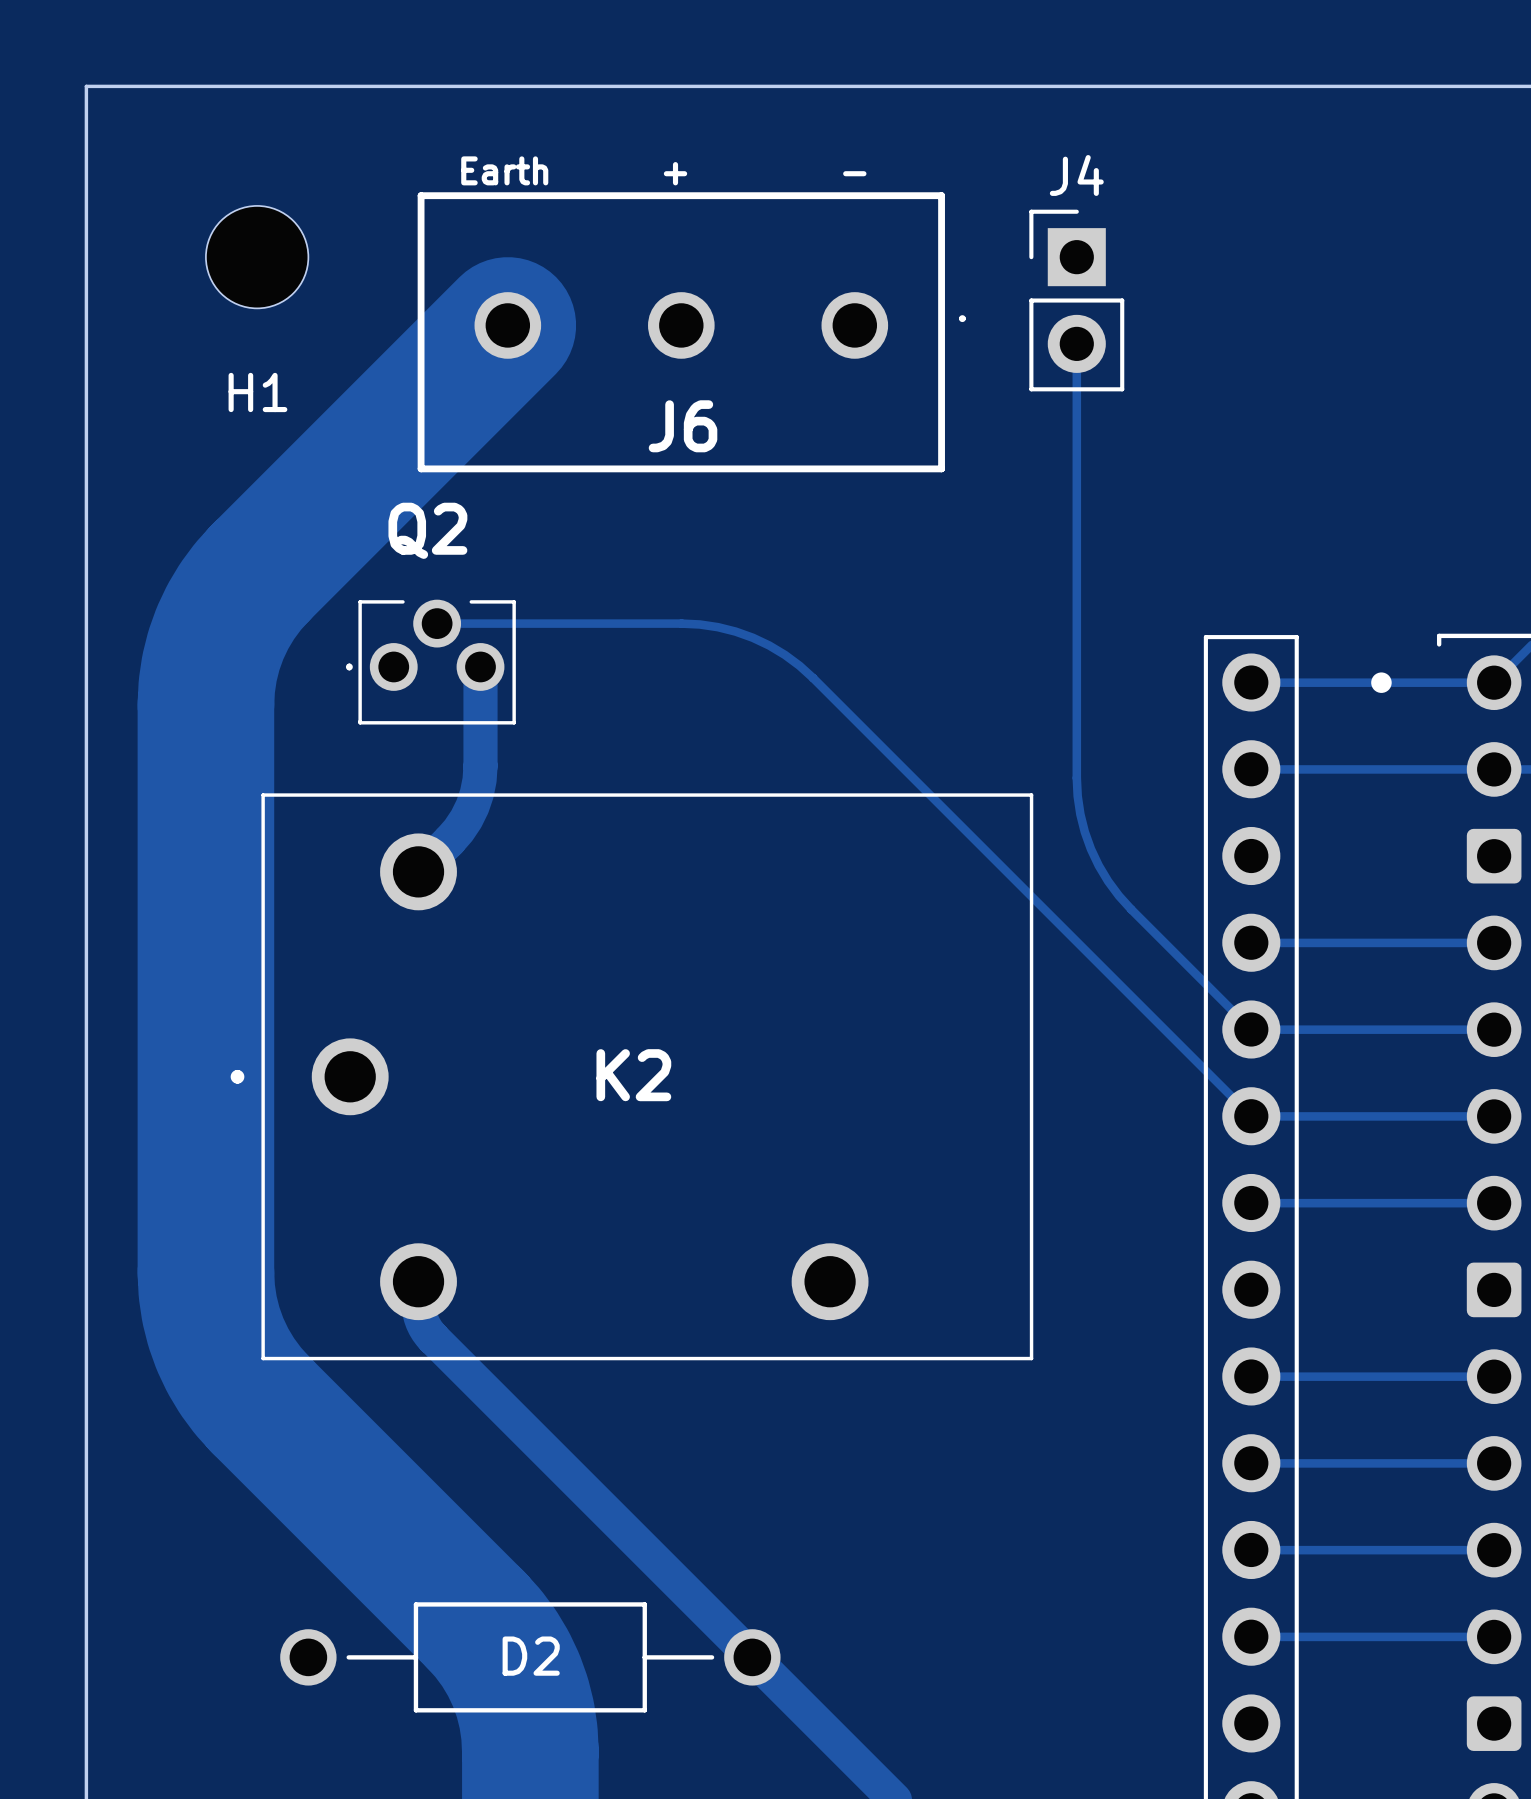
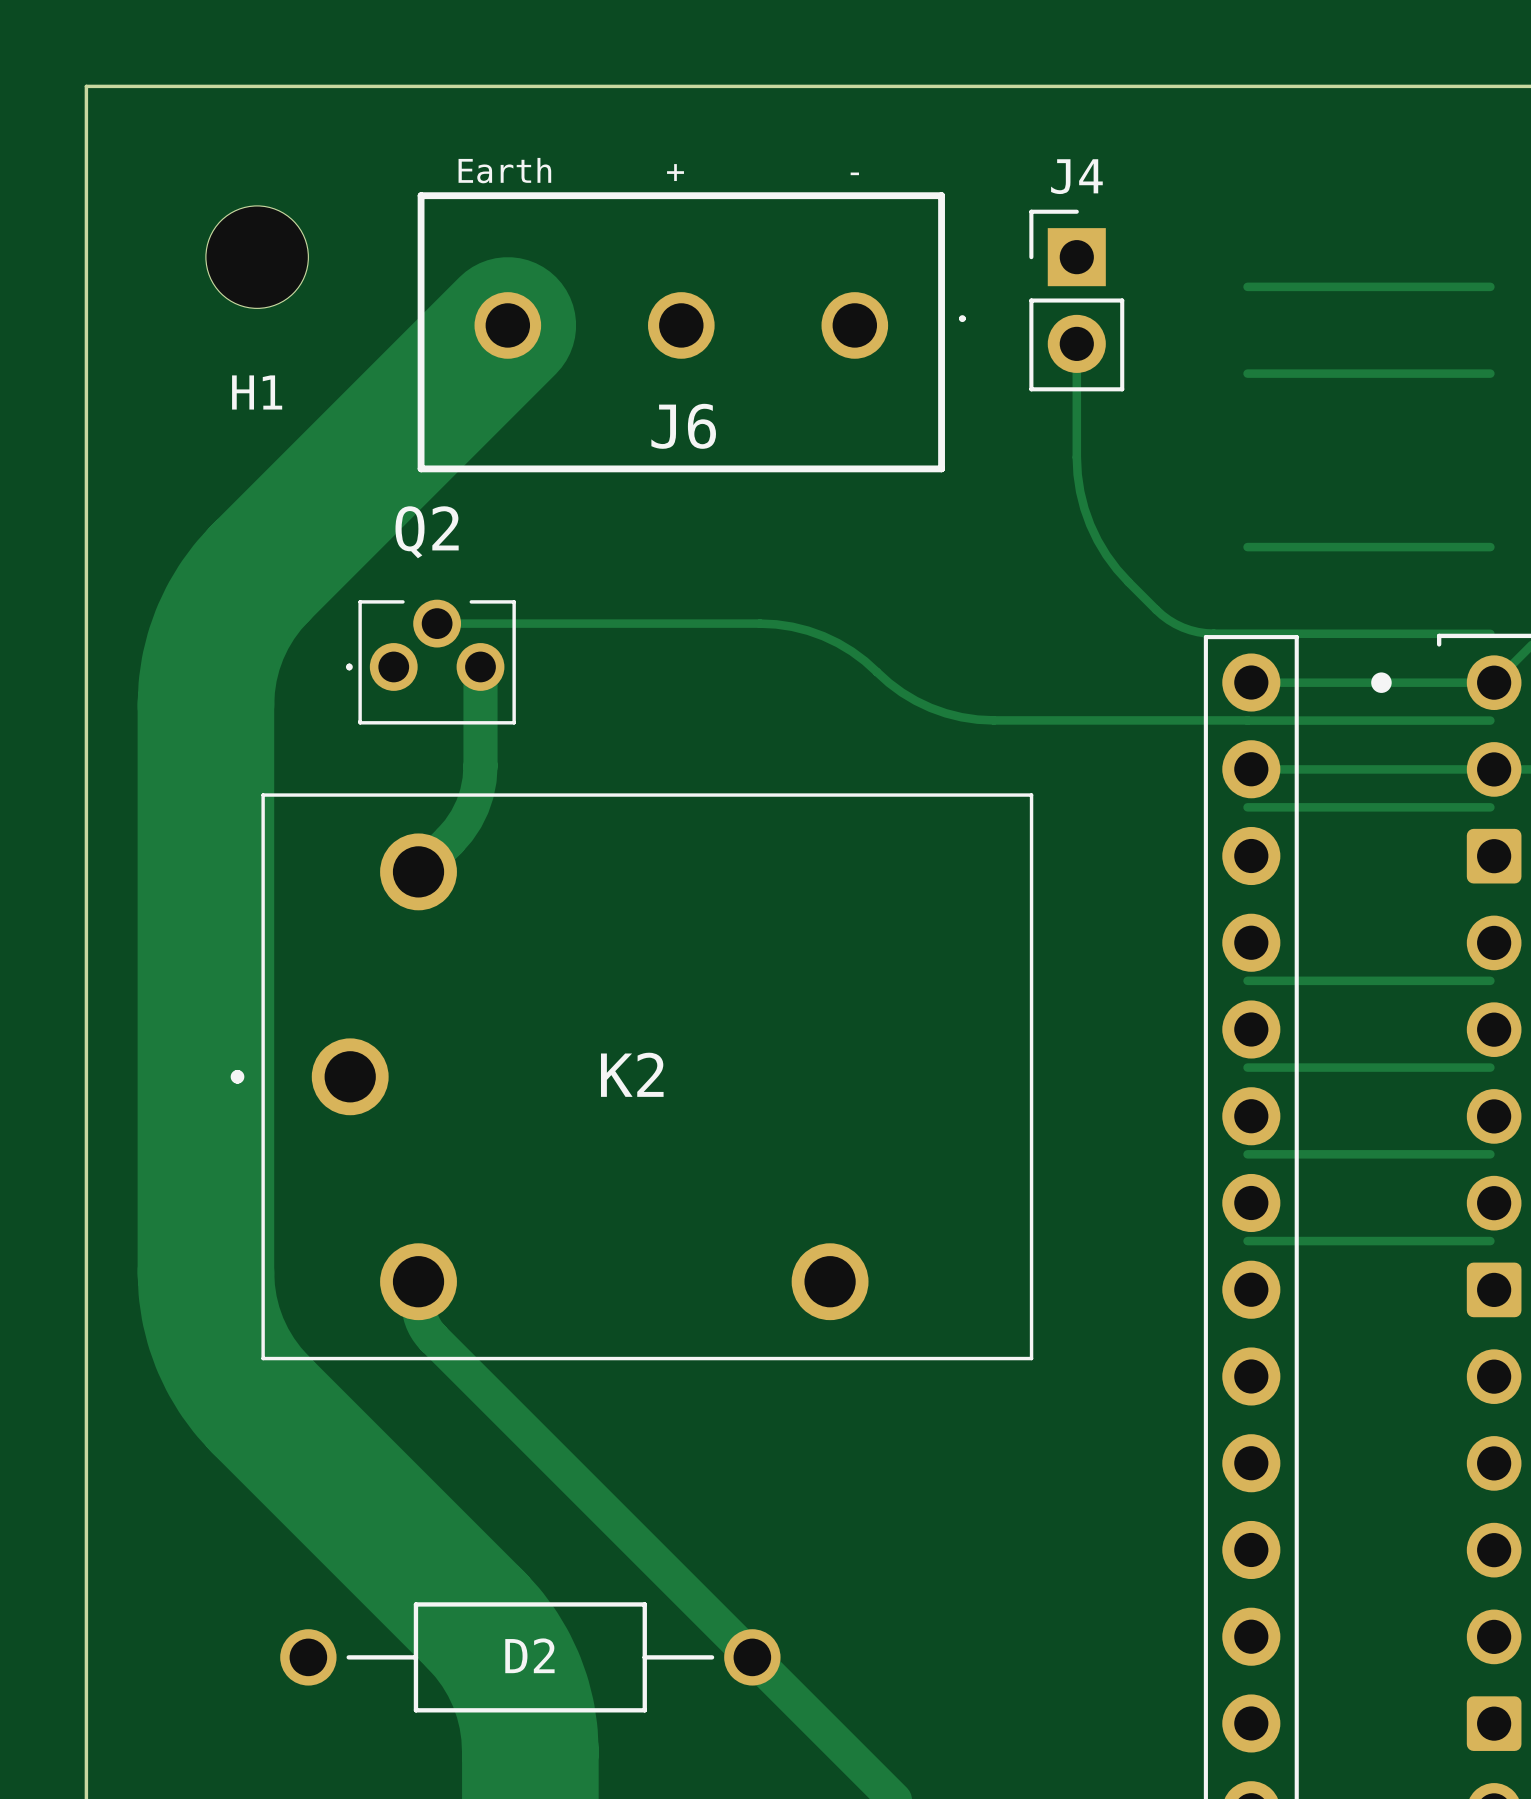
track: none -> (1247, 286) (1490, 286)
track: none -> (1247, 373) (1490, 373)
track: (1076, 457) (1076, 778) (1080, 814) (1084, 831) (1098, 865) (1118, 895) (1251, 1029) -> (1076, 457) (1077, 474) (1084, 508) (1090, 524) (1106, 555) (1128, 582) (1156, 609) (1168, 619) (1182, 627) (1197, 632) (1213, 633) (1490, 633)
track: (681, 623) (699, 624) (735, 631) (769, 645) (799, 665) (1251, 1116) (1494, 1116) -> (681, 623) (776, 624) (808, 630) (823, 636) (851, 651) (888, 682) (915, 700) (930, 707) (961, 717) (993, 720) (1247, 720)
track: (1251, 942) (1494, 942) -> (1247, 547) (1490, 547)
track: (1251, 1029) (1494, 1029) -> (1247, 720) (1490, 720)
track: (1251, 1203) (1494, 1203) -> (1247, 807) (1490, 807)
track: (1251, 1376) (1494, 1376) -> (1247, 980) (1490, 980)
track: (1251, 1463) (1494, 1463) -> (1247, 1067) (1490, 1067)
track: (1251, 1550) (1494, 1550) -> (1247, 1154) (1490, 1154)
track: (1251, 1636) (1494, 1636) -> (1247, 1241) (1490, 1241)

